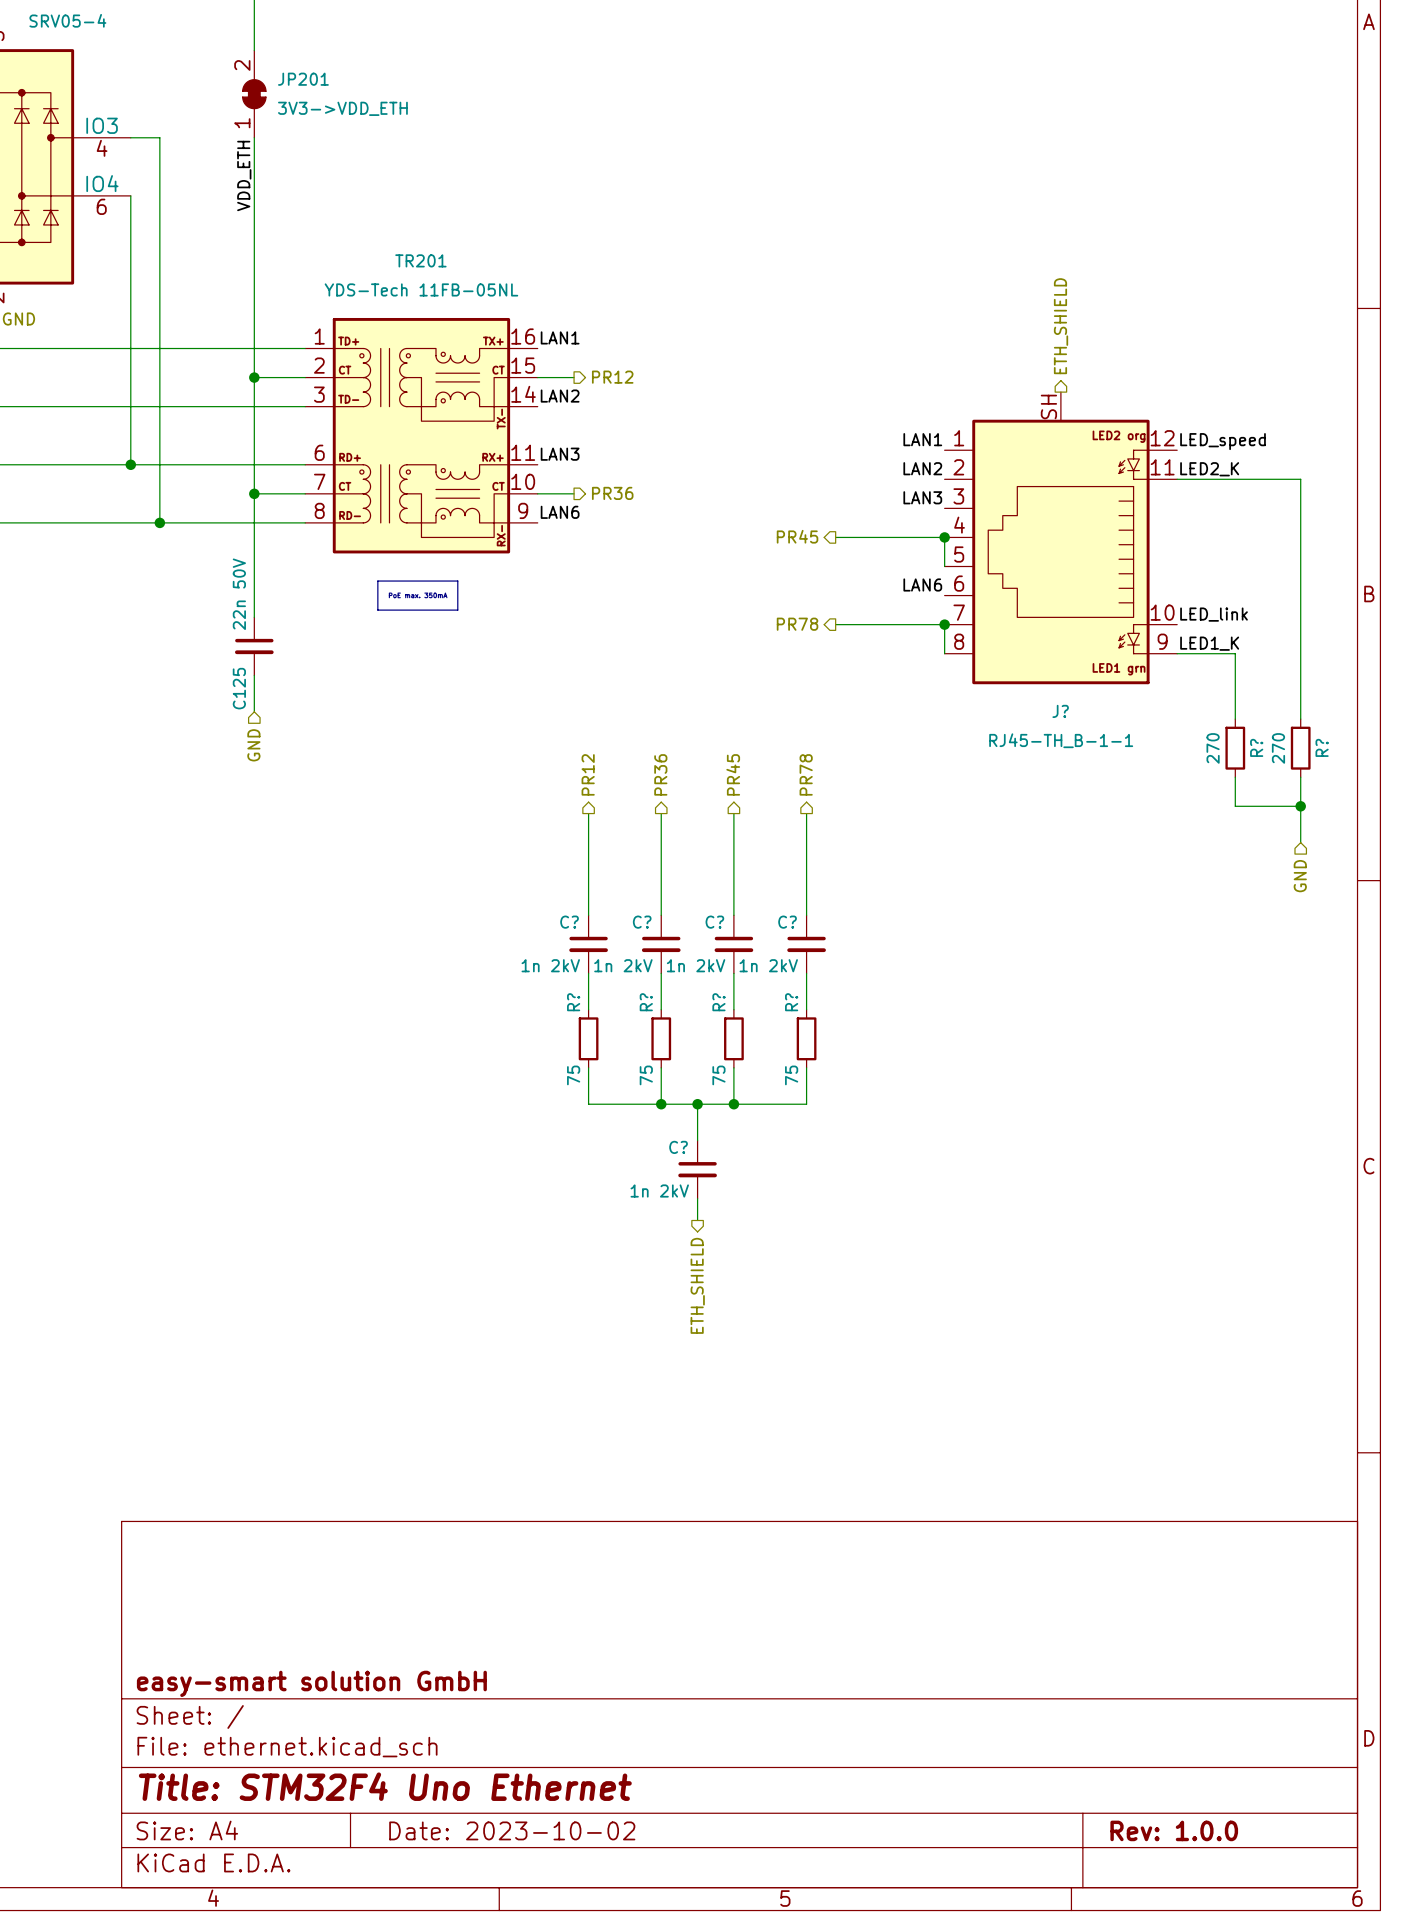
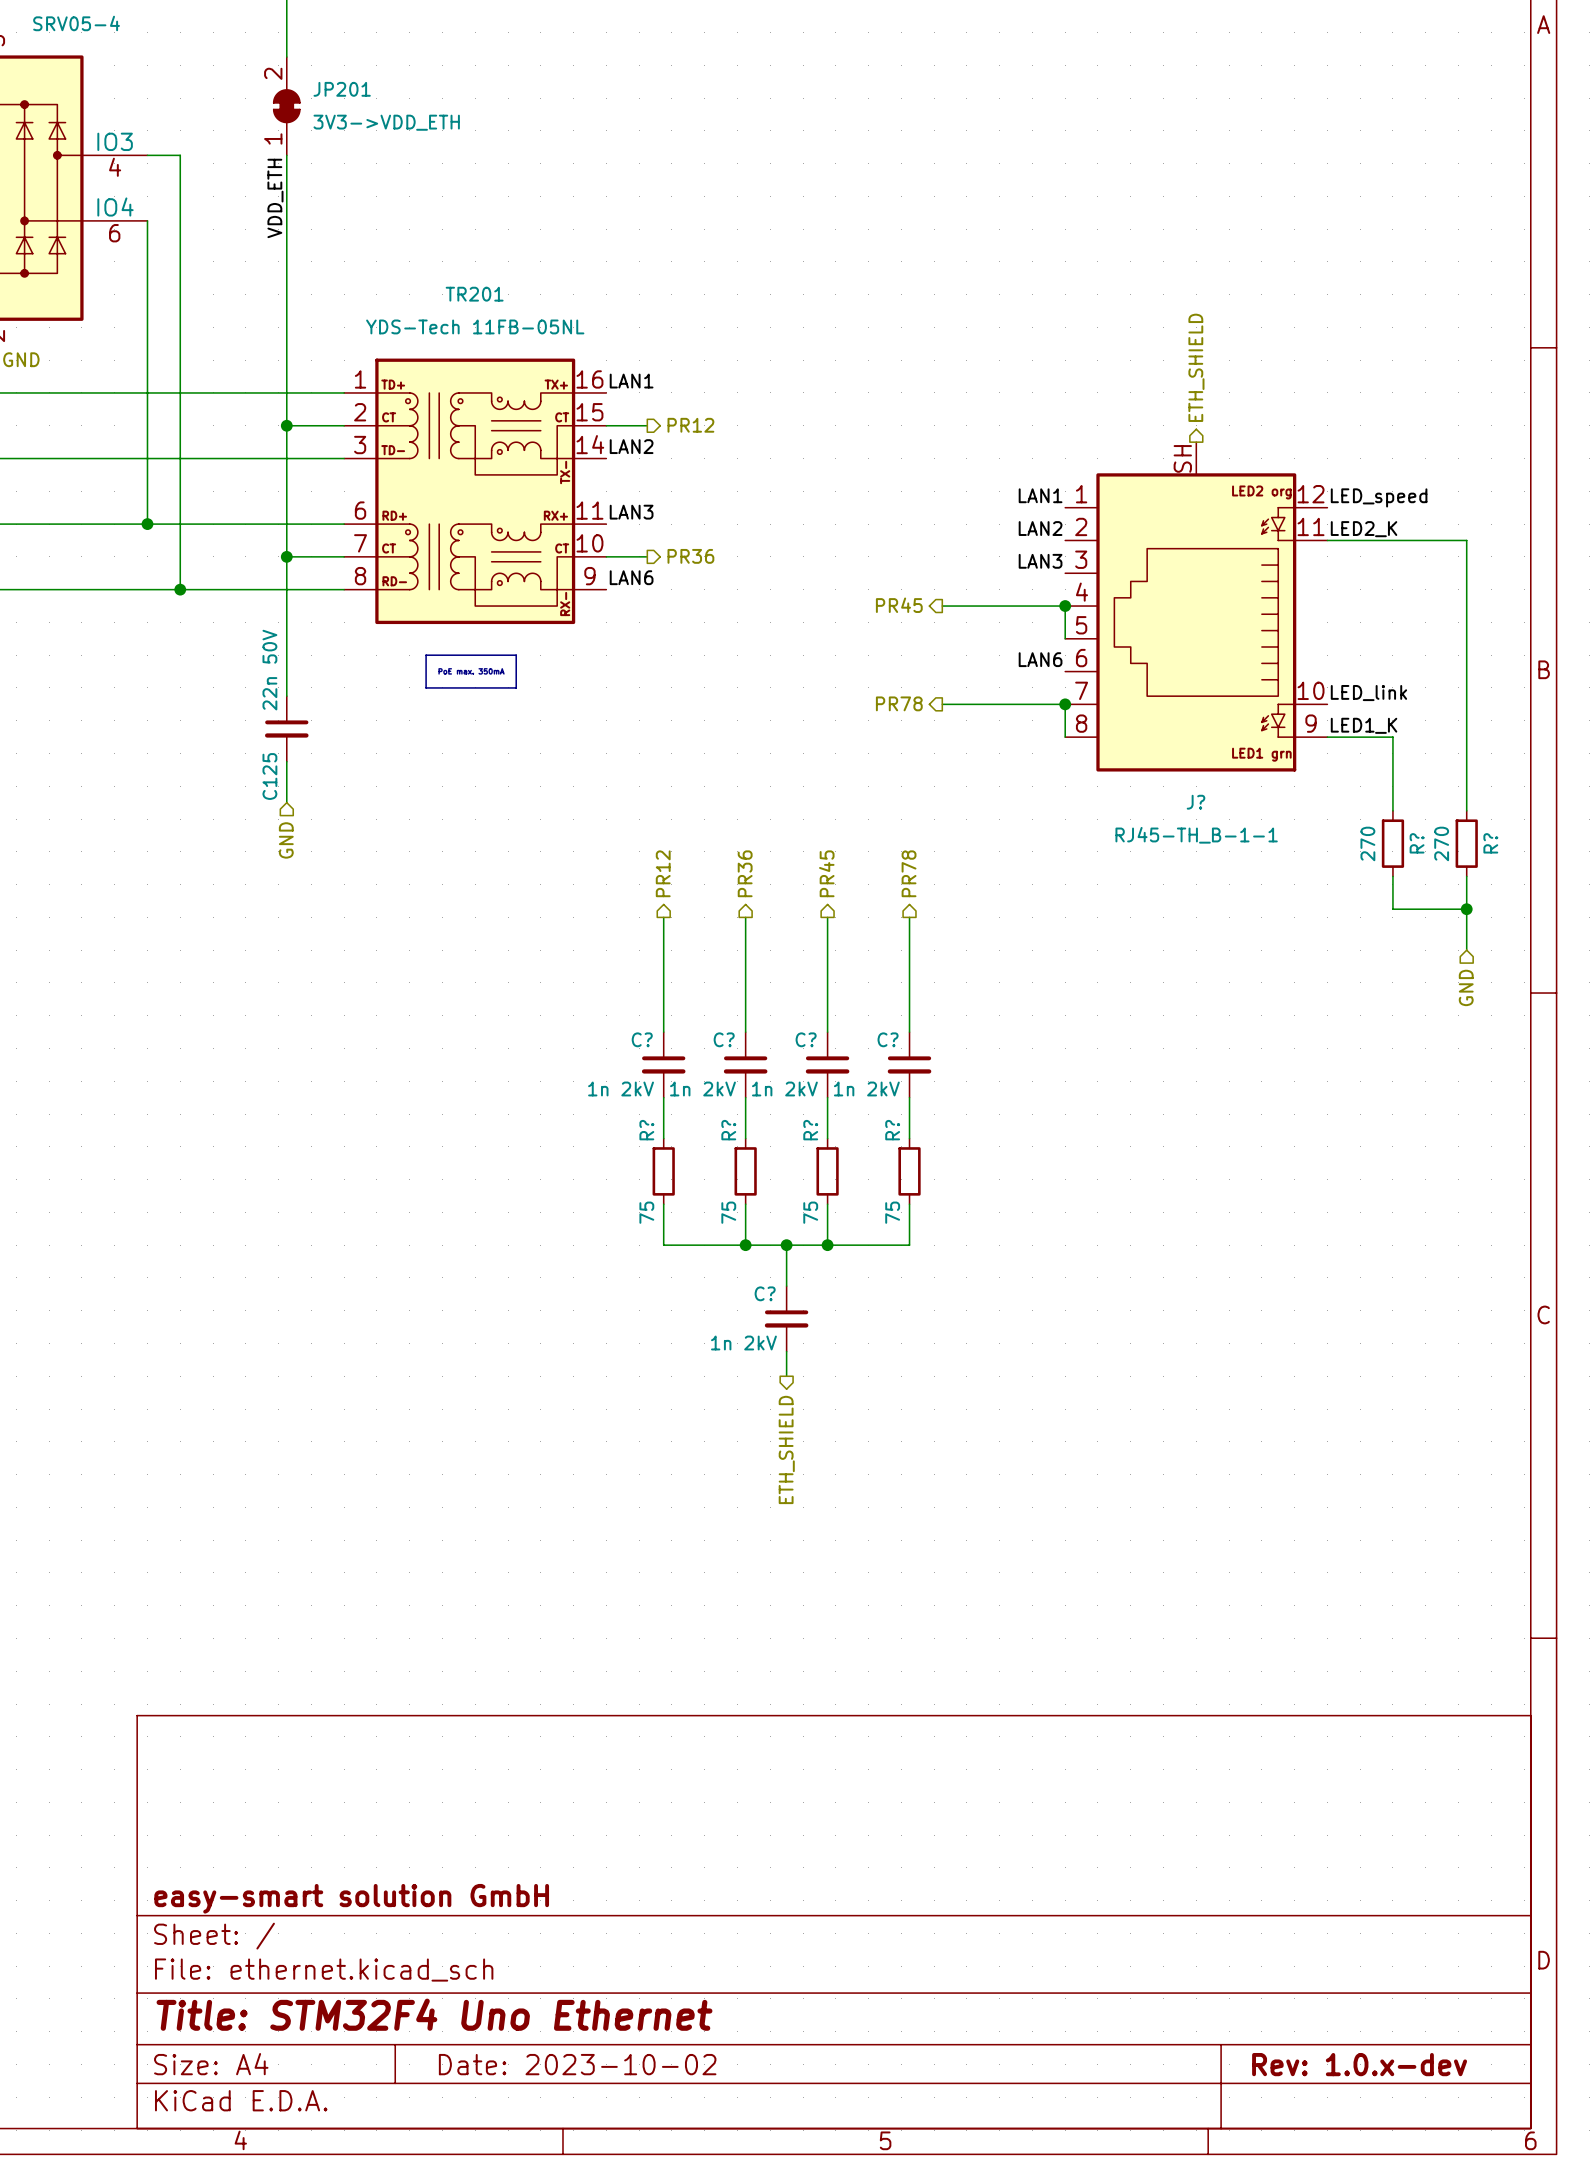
title block: Rev: 1.0.0 (1174, 1830) -> Rev: 1.0.x-dev (1359, 2064)

